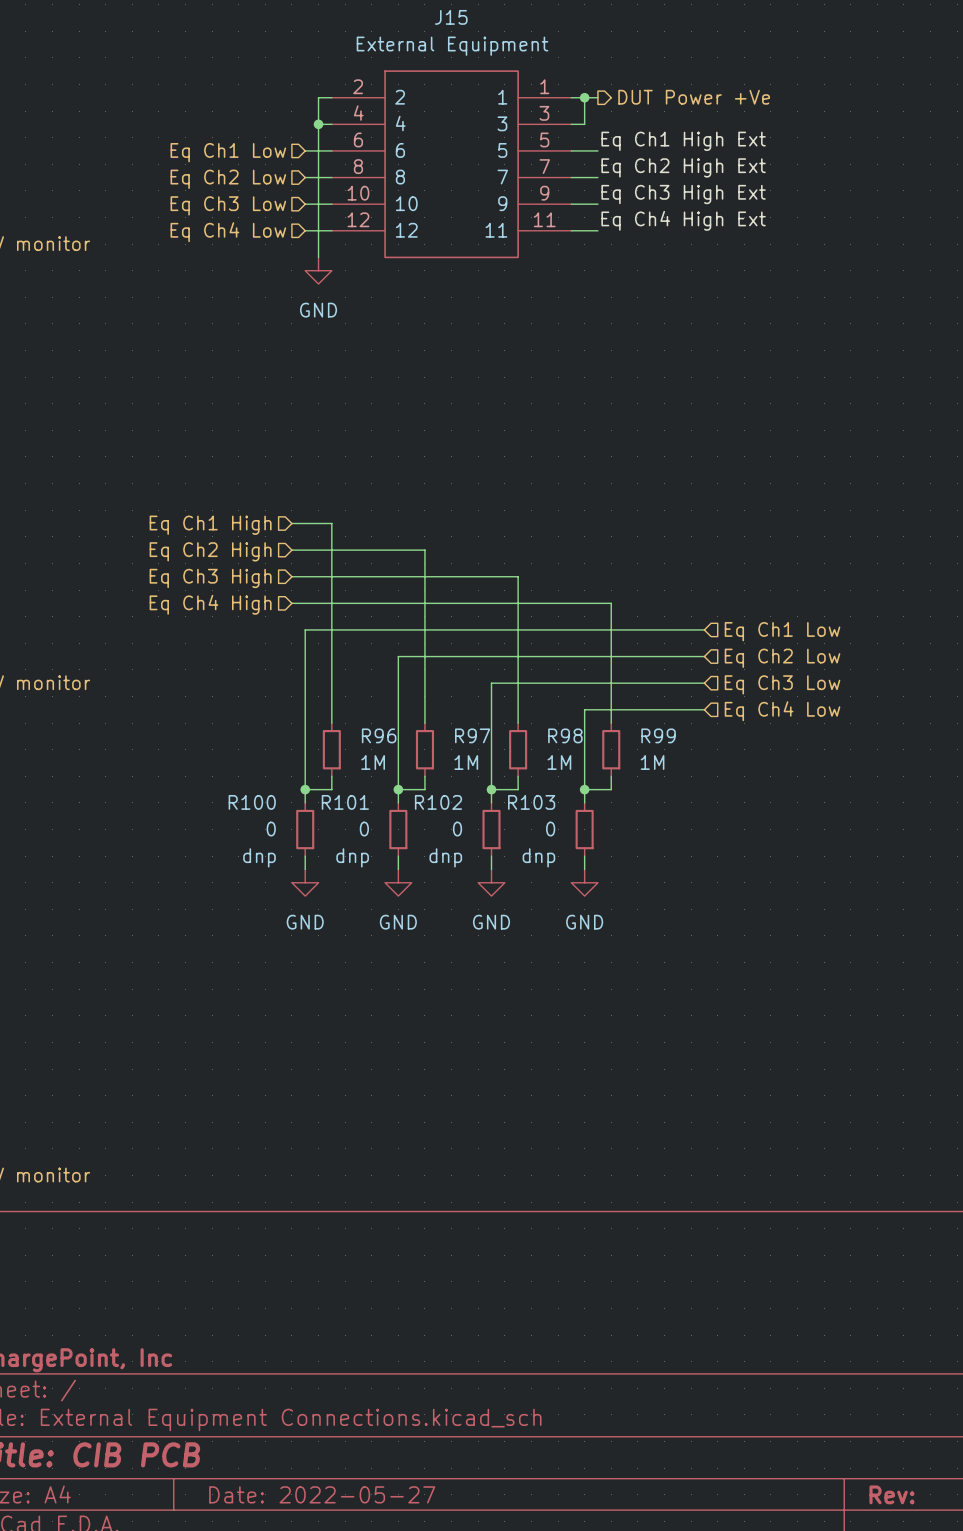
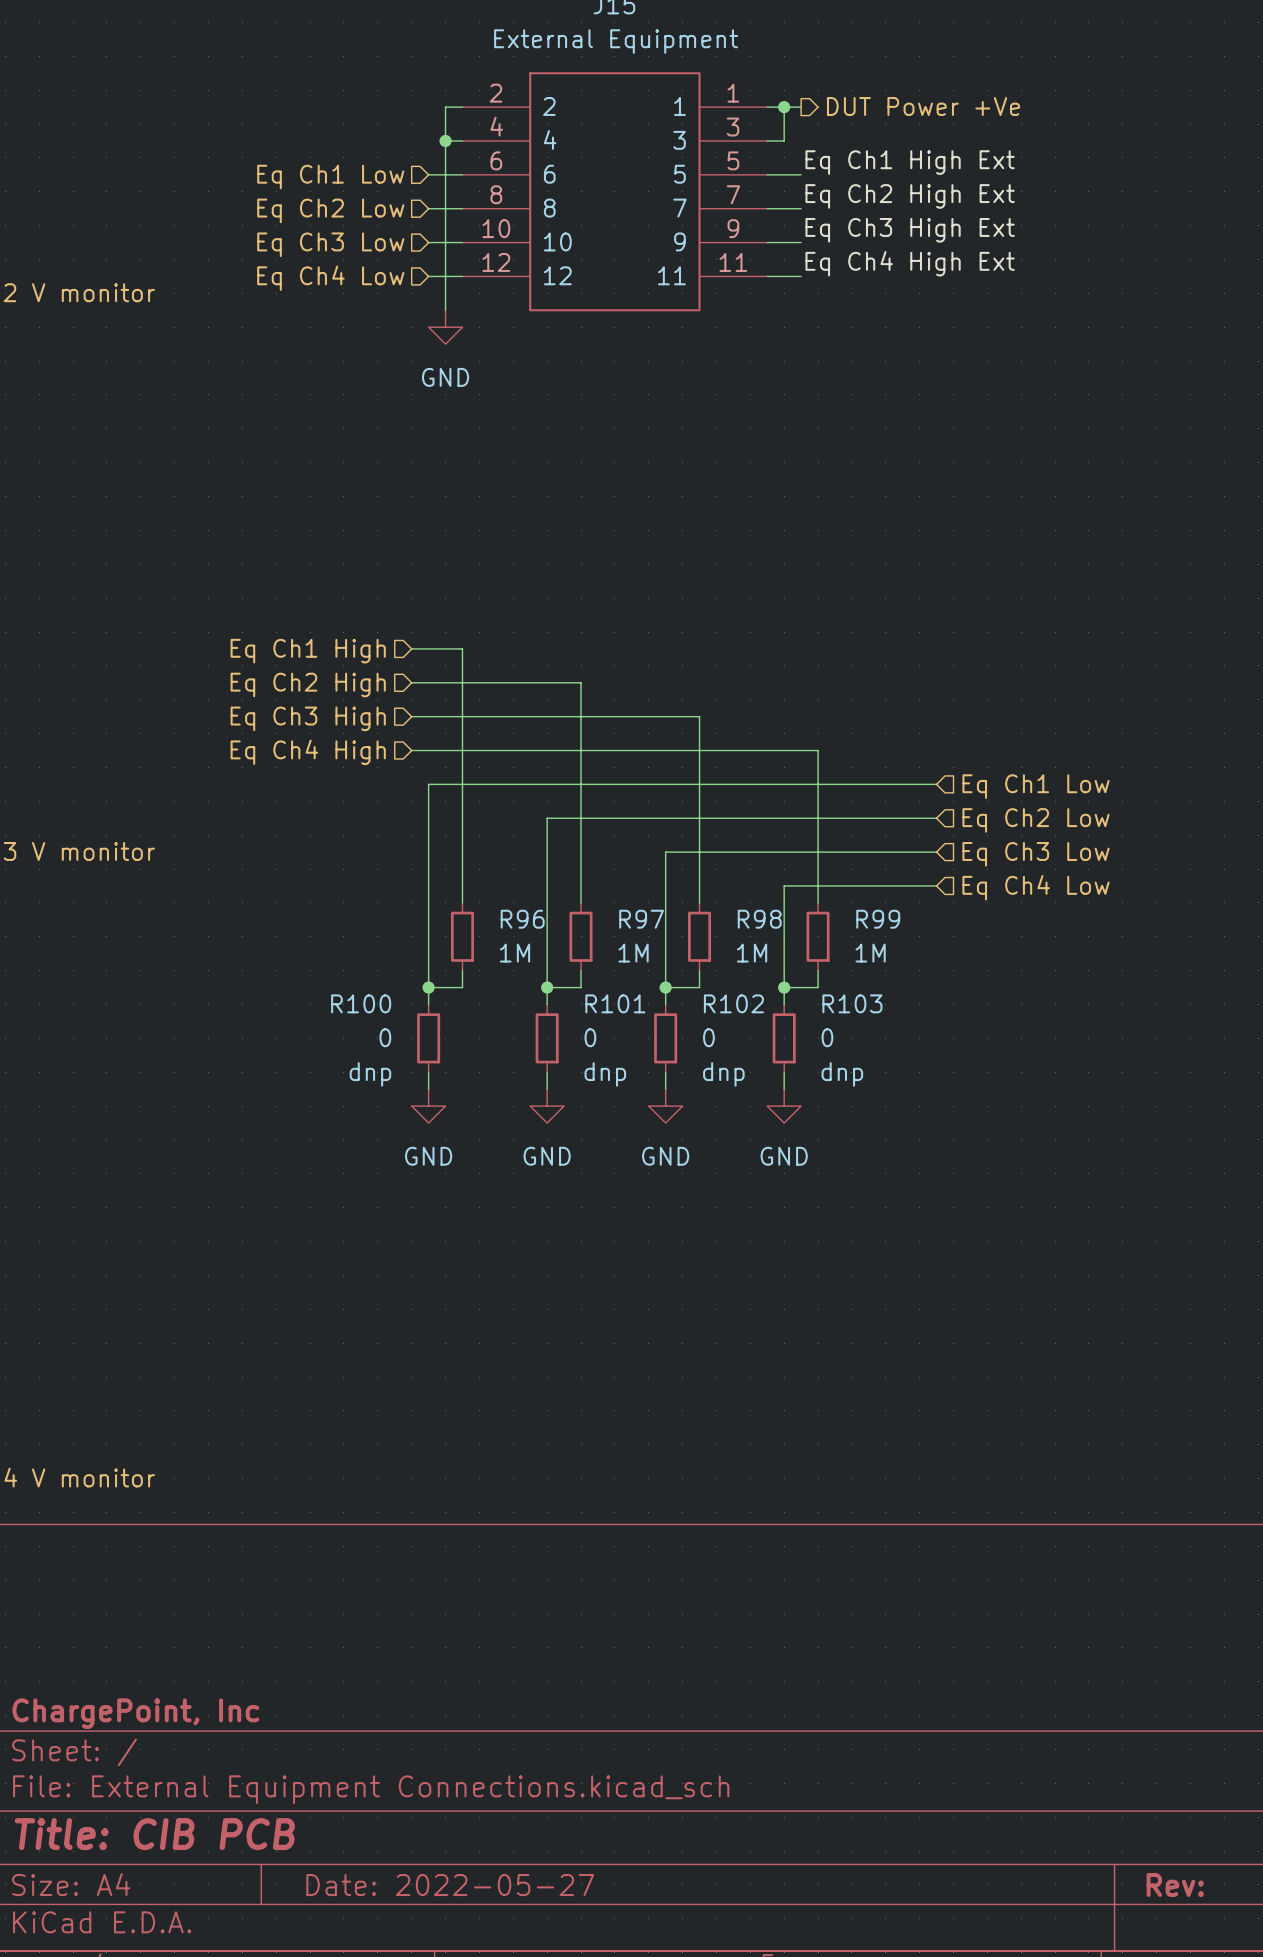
R101 name position: R101 (345, 802) -> R101 (615, 1003)
R102 name position: R102 (438, 802) -> R102 (733, 1003)
R103 name position: R103 (531, 802) -> R103 (852, 1003)
R101 value position: 0 (364, 829) -> 0 (590, 1037)
R102 value position: 0 (457, 829) -> 0 (708, 1037)
R103 value position: 0 (550, 829) -> 0 (827, 1037)
R101 text position: dnp (352, 857) -> dnp (605, 1074)
R102 text position: dnp (445, 857) -> dnp (723, 1074)
R103 text position: dnp (538, 857) -> dnp (842, 1074)

